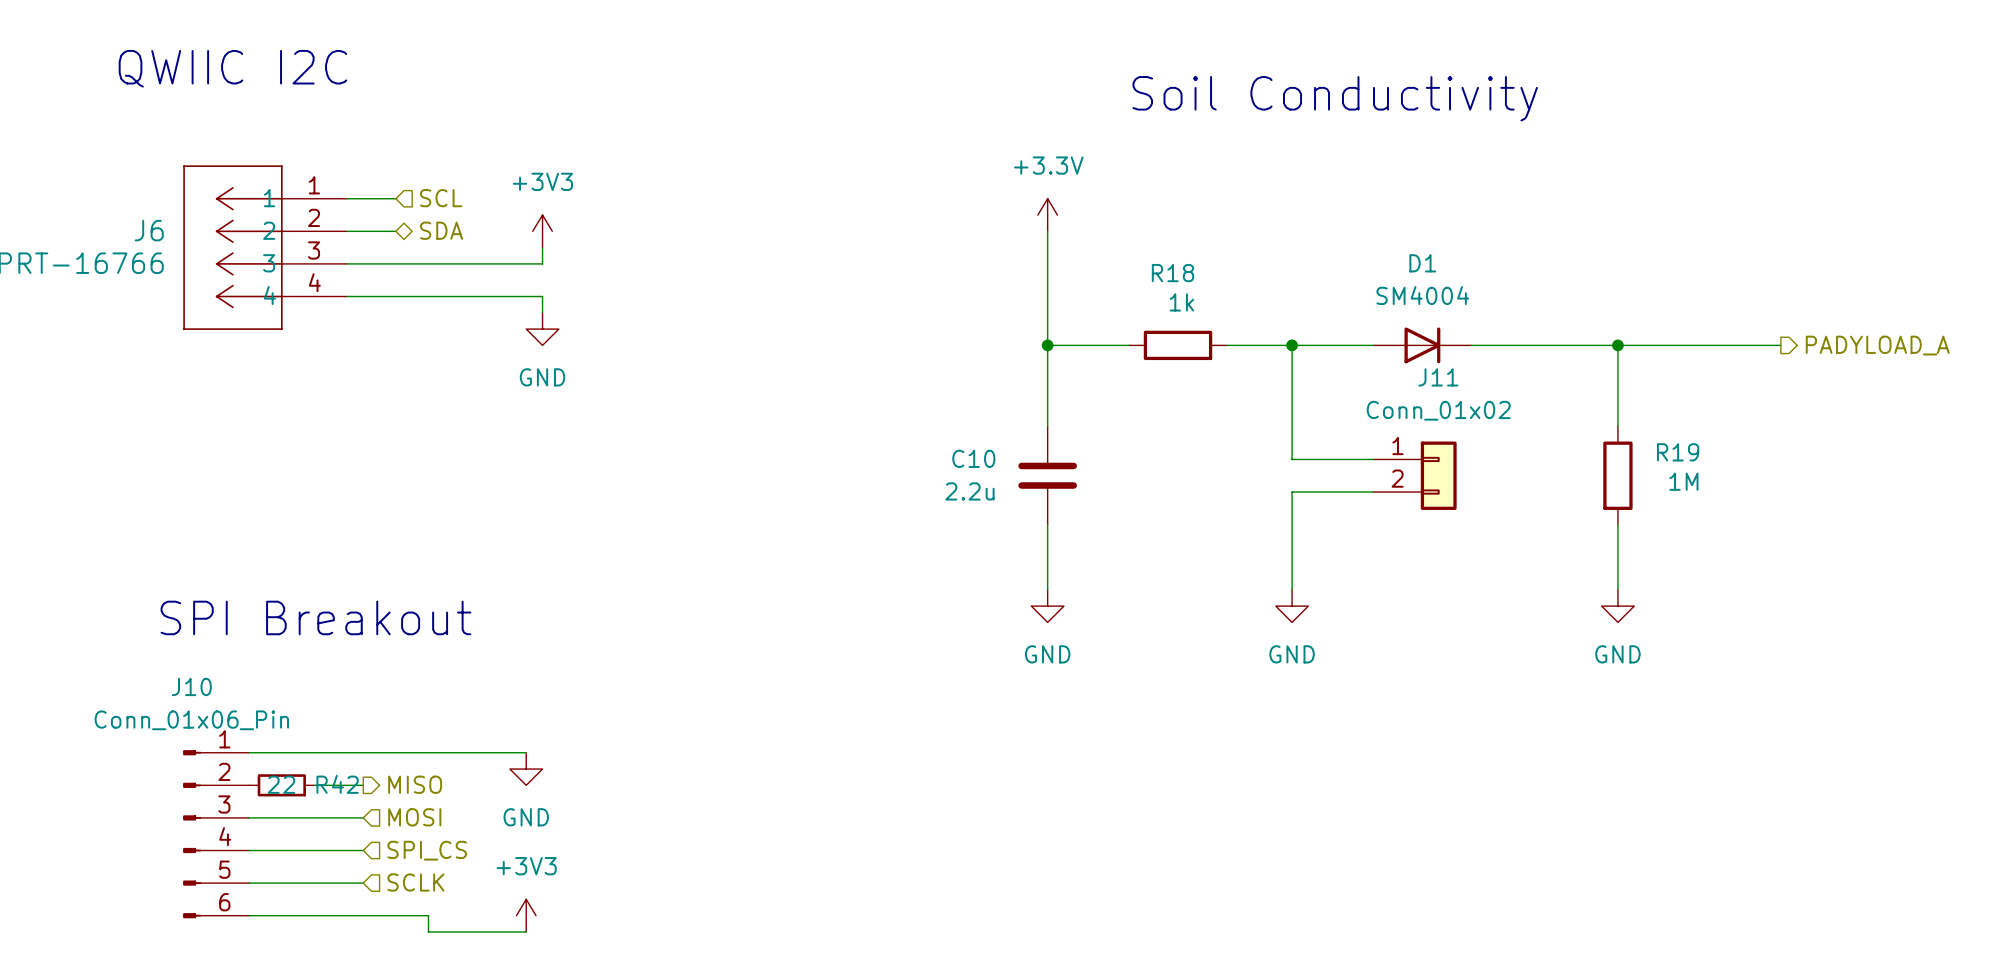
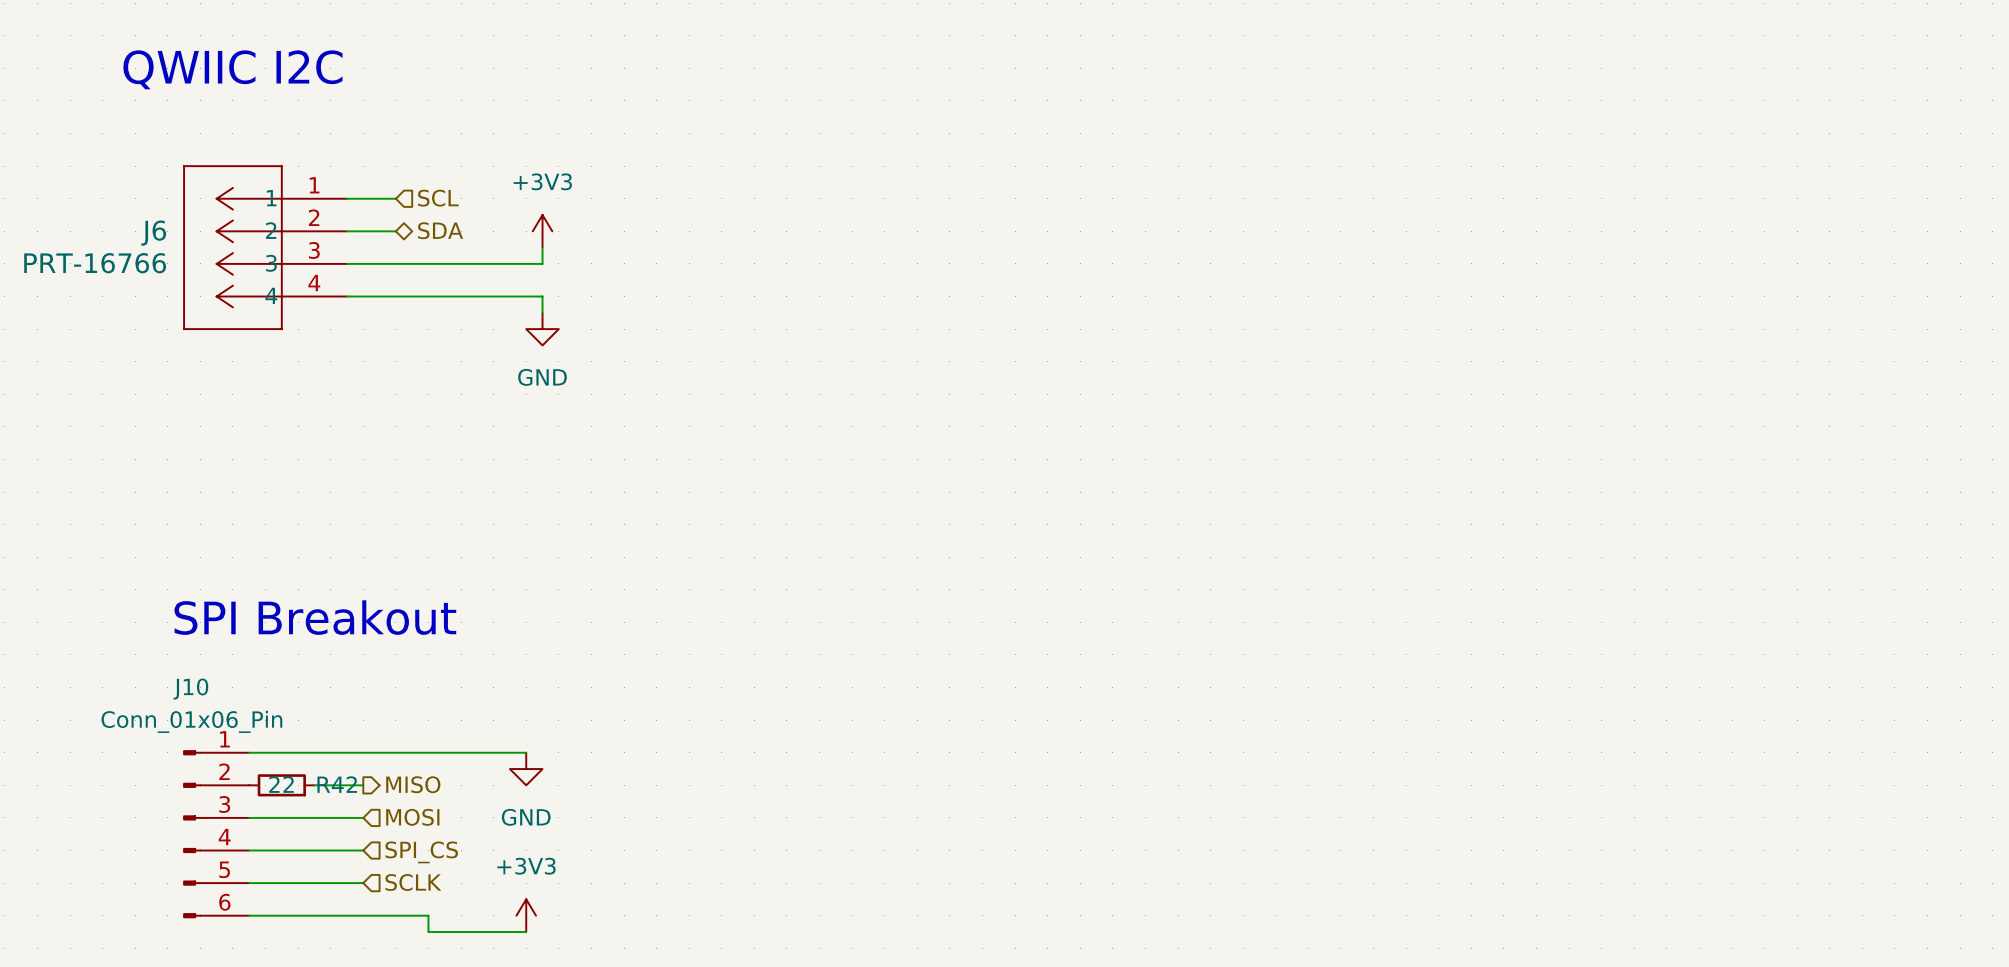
text: Soil Conductivity (1335, 98) -> none
power symbol: +3.3V (1047, 215) -> none
wire: (1047, 231) (1047, 426) -> none
wire: (1047, 345) (1129, 345) -> none
junction: (1047, 345) -> none
R18: 1k (1178, 345) -> none
wire: (1226, 345) (1373, 345) -> none
wire: (1292, 345) (1292, 459) (1373, 459) -> none
junction: (1292, 345) -> none
D1: SM4004 (1422, 345) -> none
wire: (1471, 345) (1780, 345) -> none
wire: (1617, 345) (1617, 426) -> none
junction: (1617, 345) -> none
hierarchical label: PADYLOAD_A (1877, 345) -> none
C10: 2.2u (1047, 475) -> none
J11: Conn_01x02 (1415, 475) -> none
R19: 1M (1617, 475) -> none
wire: (1373, 492) (1292, 492) (1292, 589) -> none
wire: (1047, 524) (1047, 589) -> none
wire: (1617, 524) (1617, 589) -> none
power symbol: GND (1047, 606) -> none
power symbol: GND (1292, 606) -> none
power symbol: GND (1617, 606) -> none

